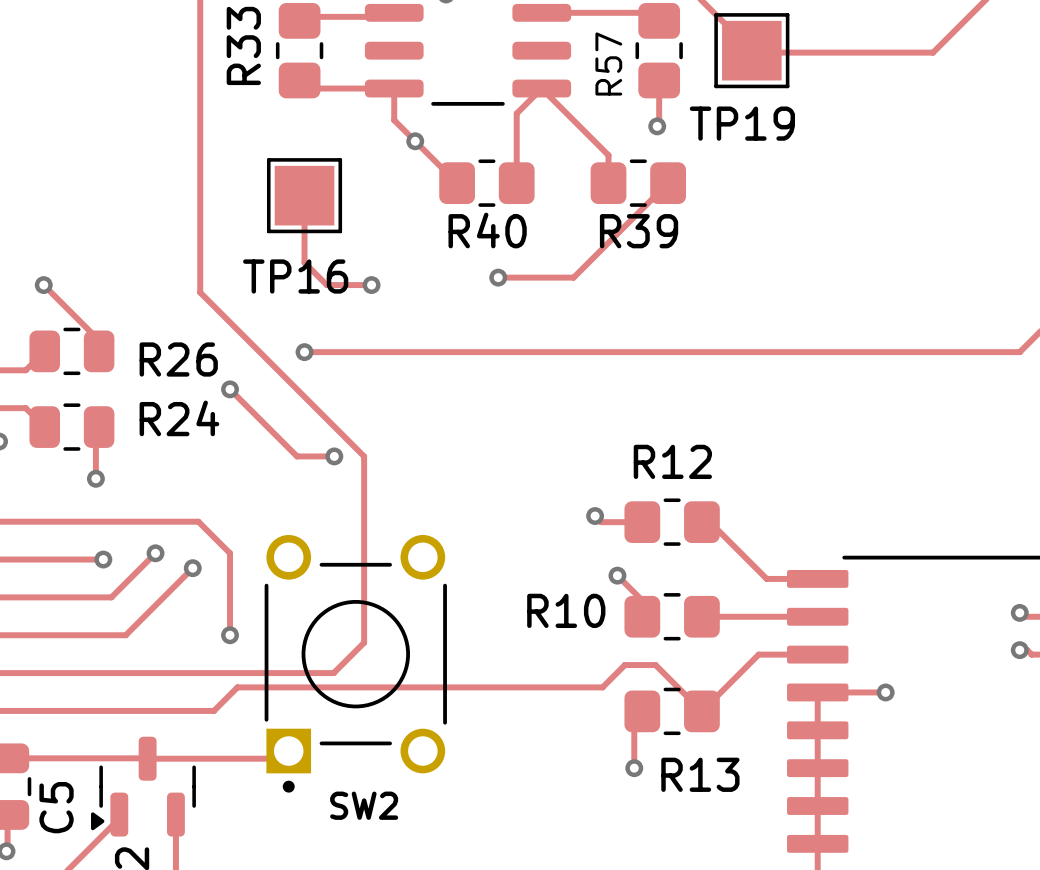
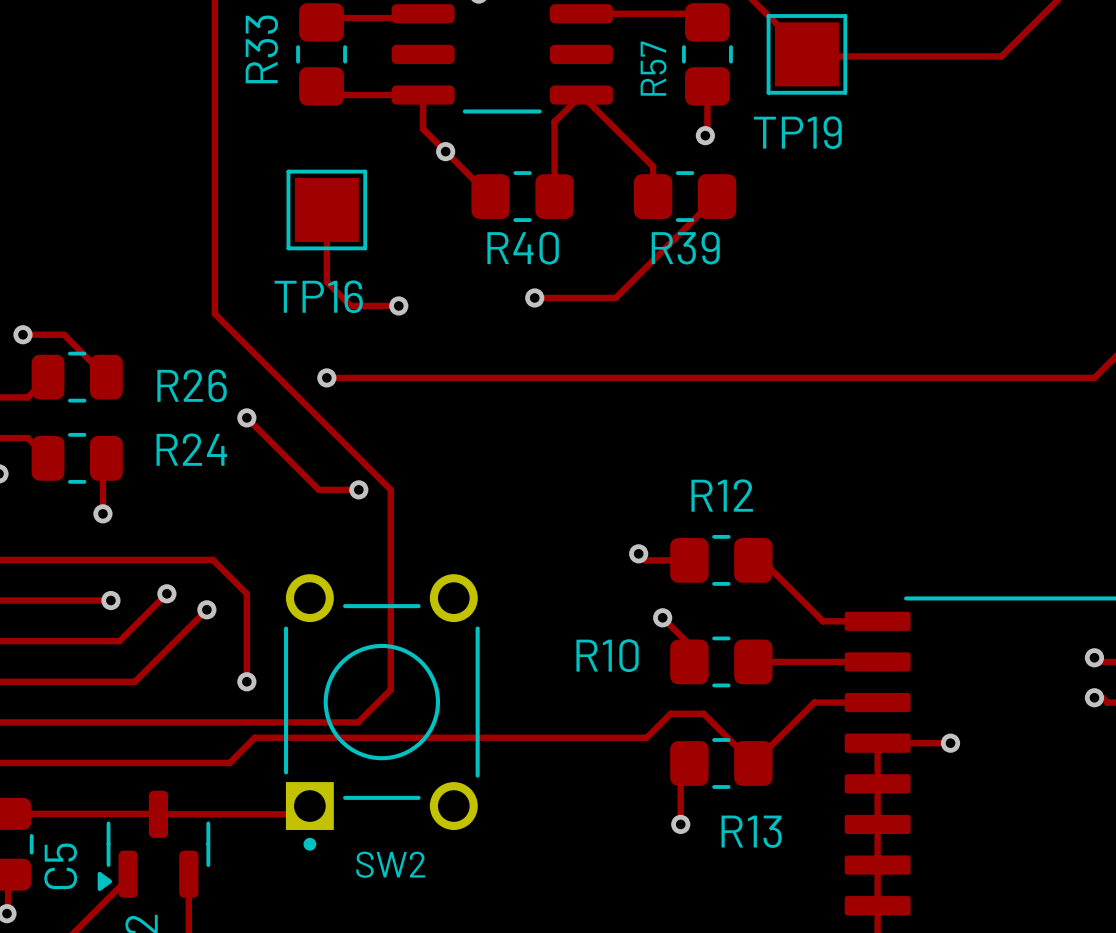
track: (43, 285) (99, 340) (99, 351) -> (22, 334) (63, 334) (106, 377)
via position: (43, 285) -> (22, 334)

